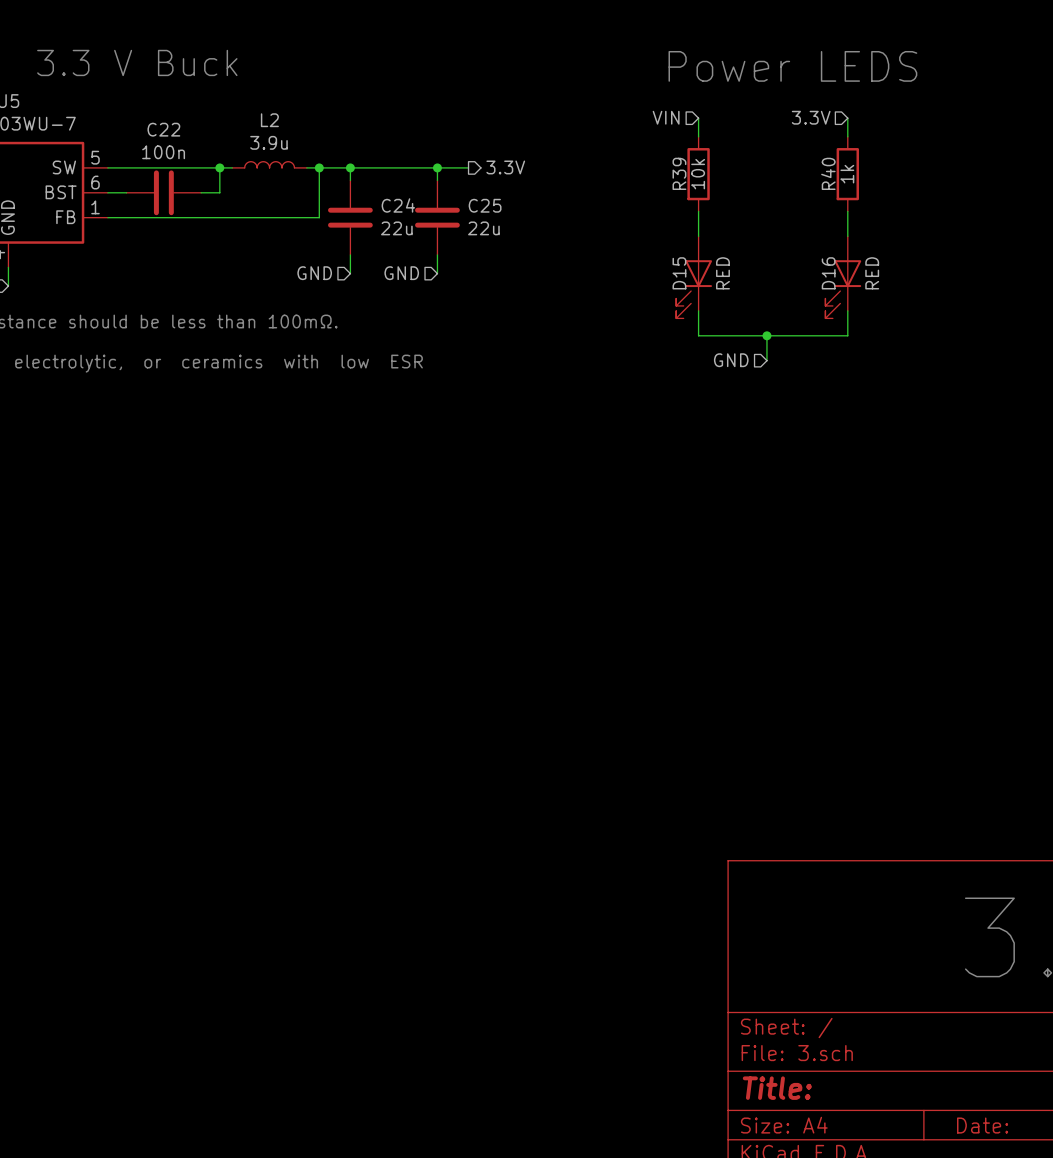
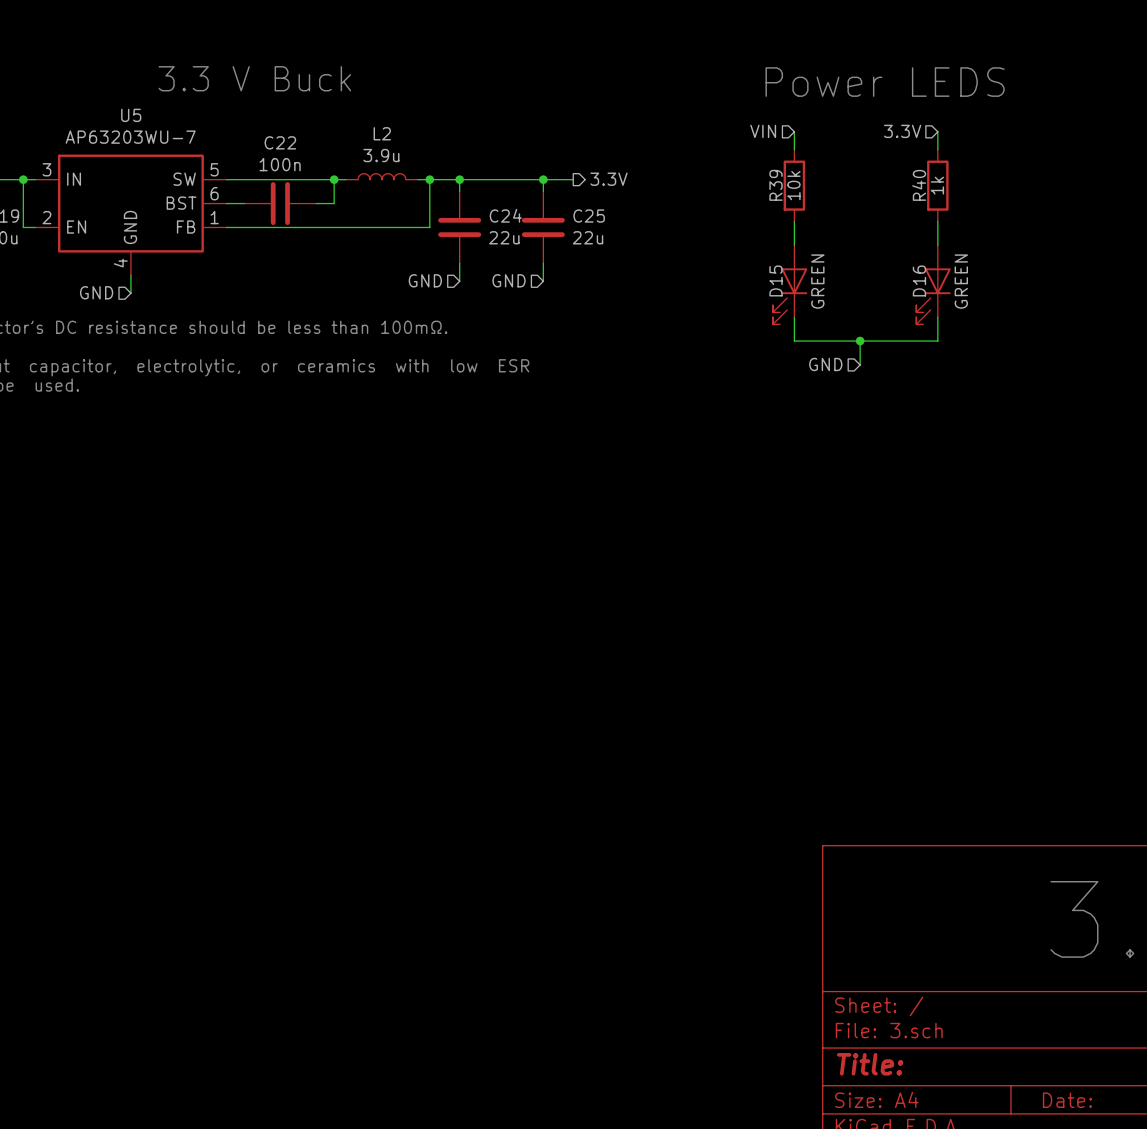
D15 value: RED (722, 273) -> GREEN (817, 281)
D16 value: RED (872, 273) -> GREEN (961, 281)

